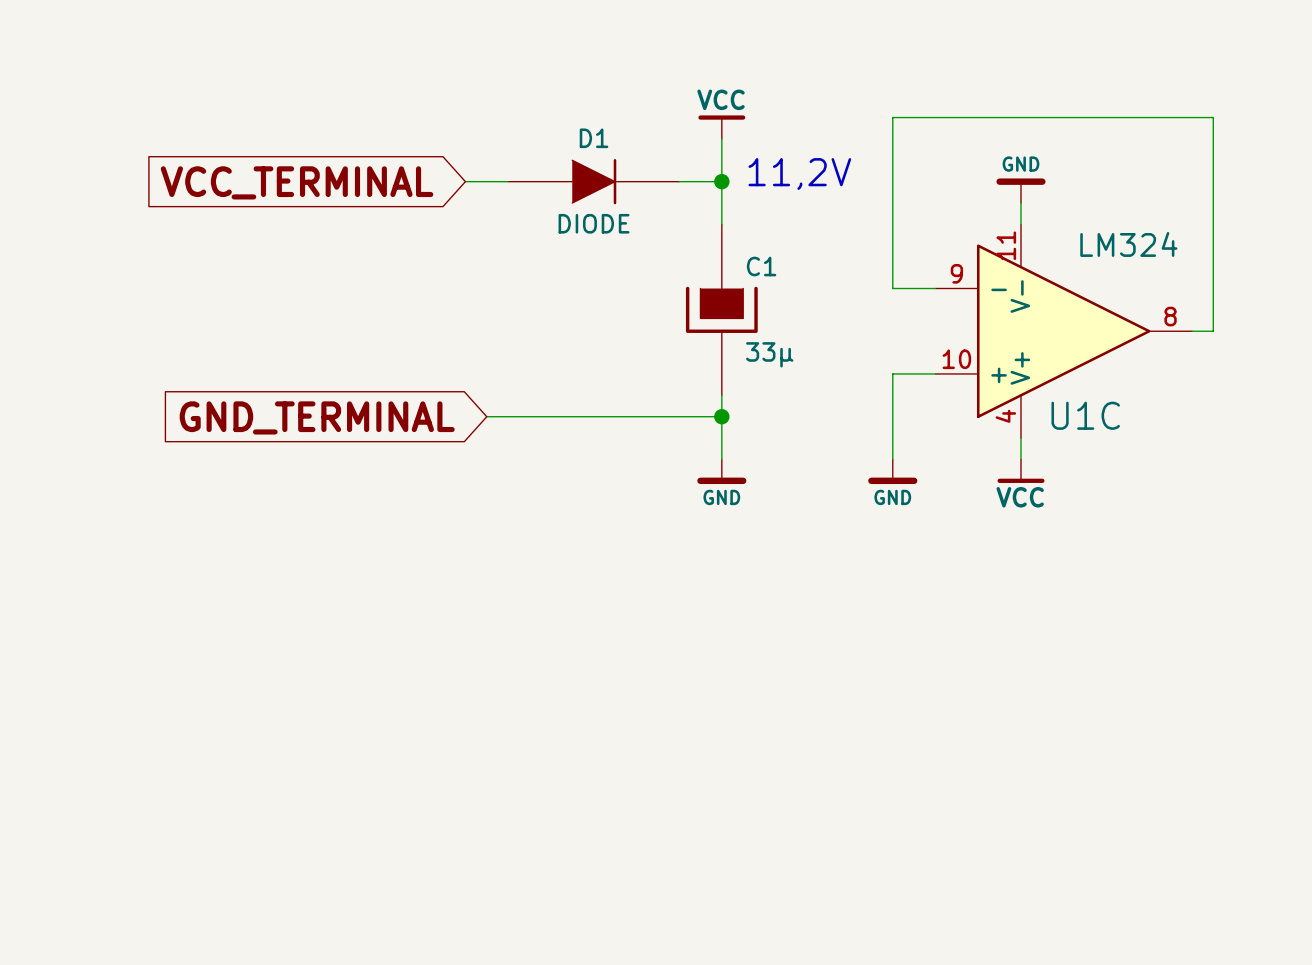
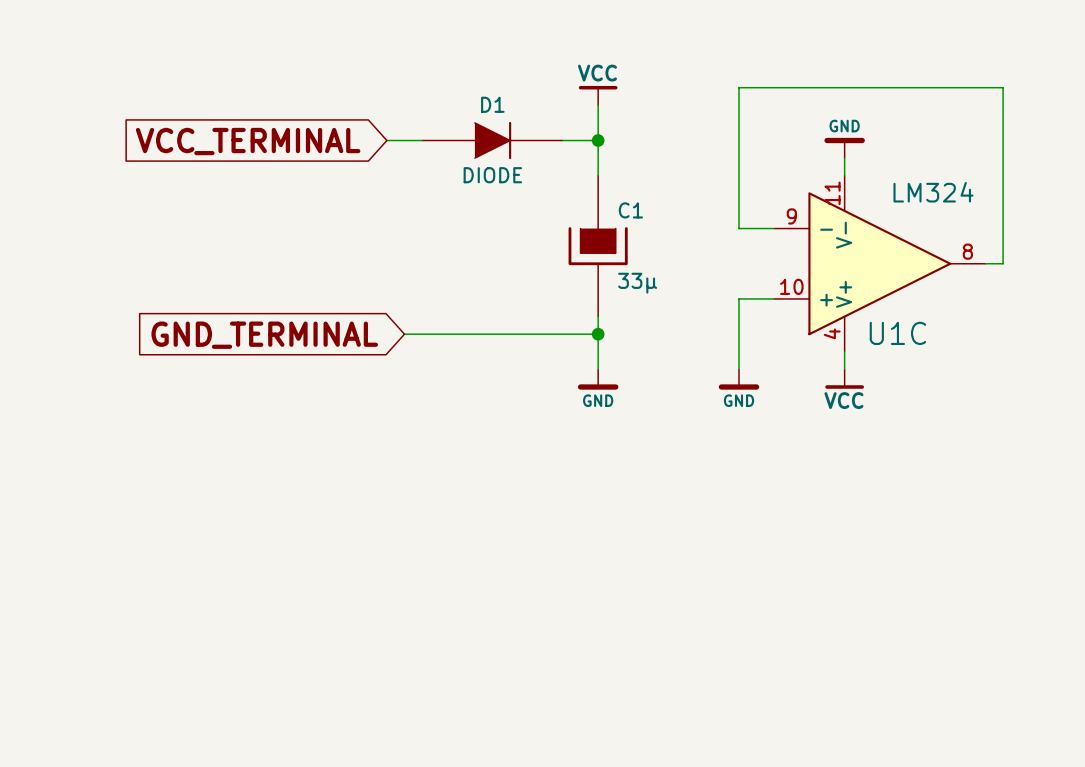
text: 11,2V (799, 174) -> none

